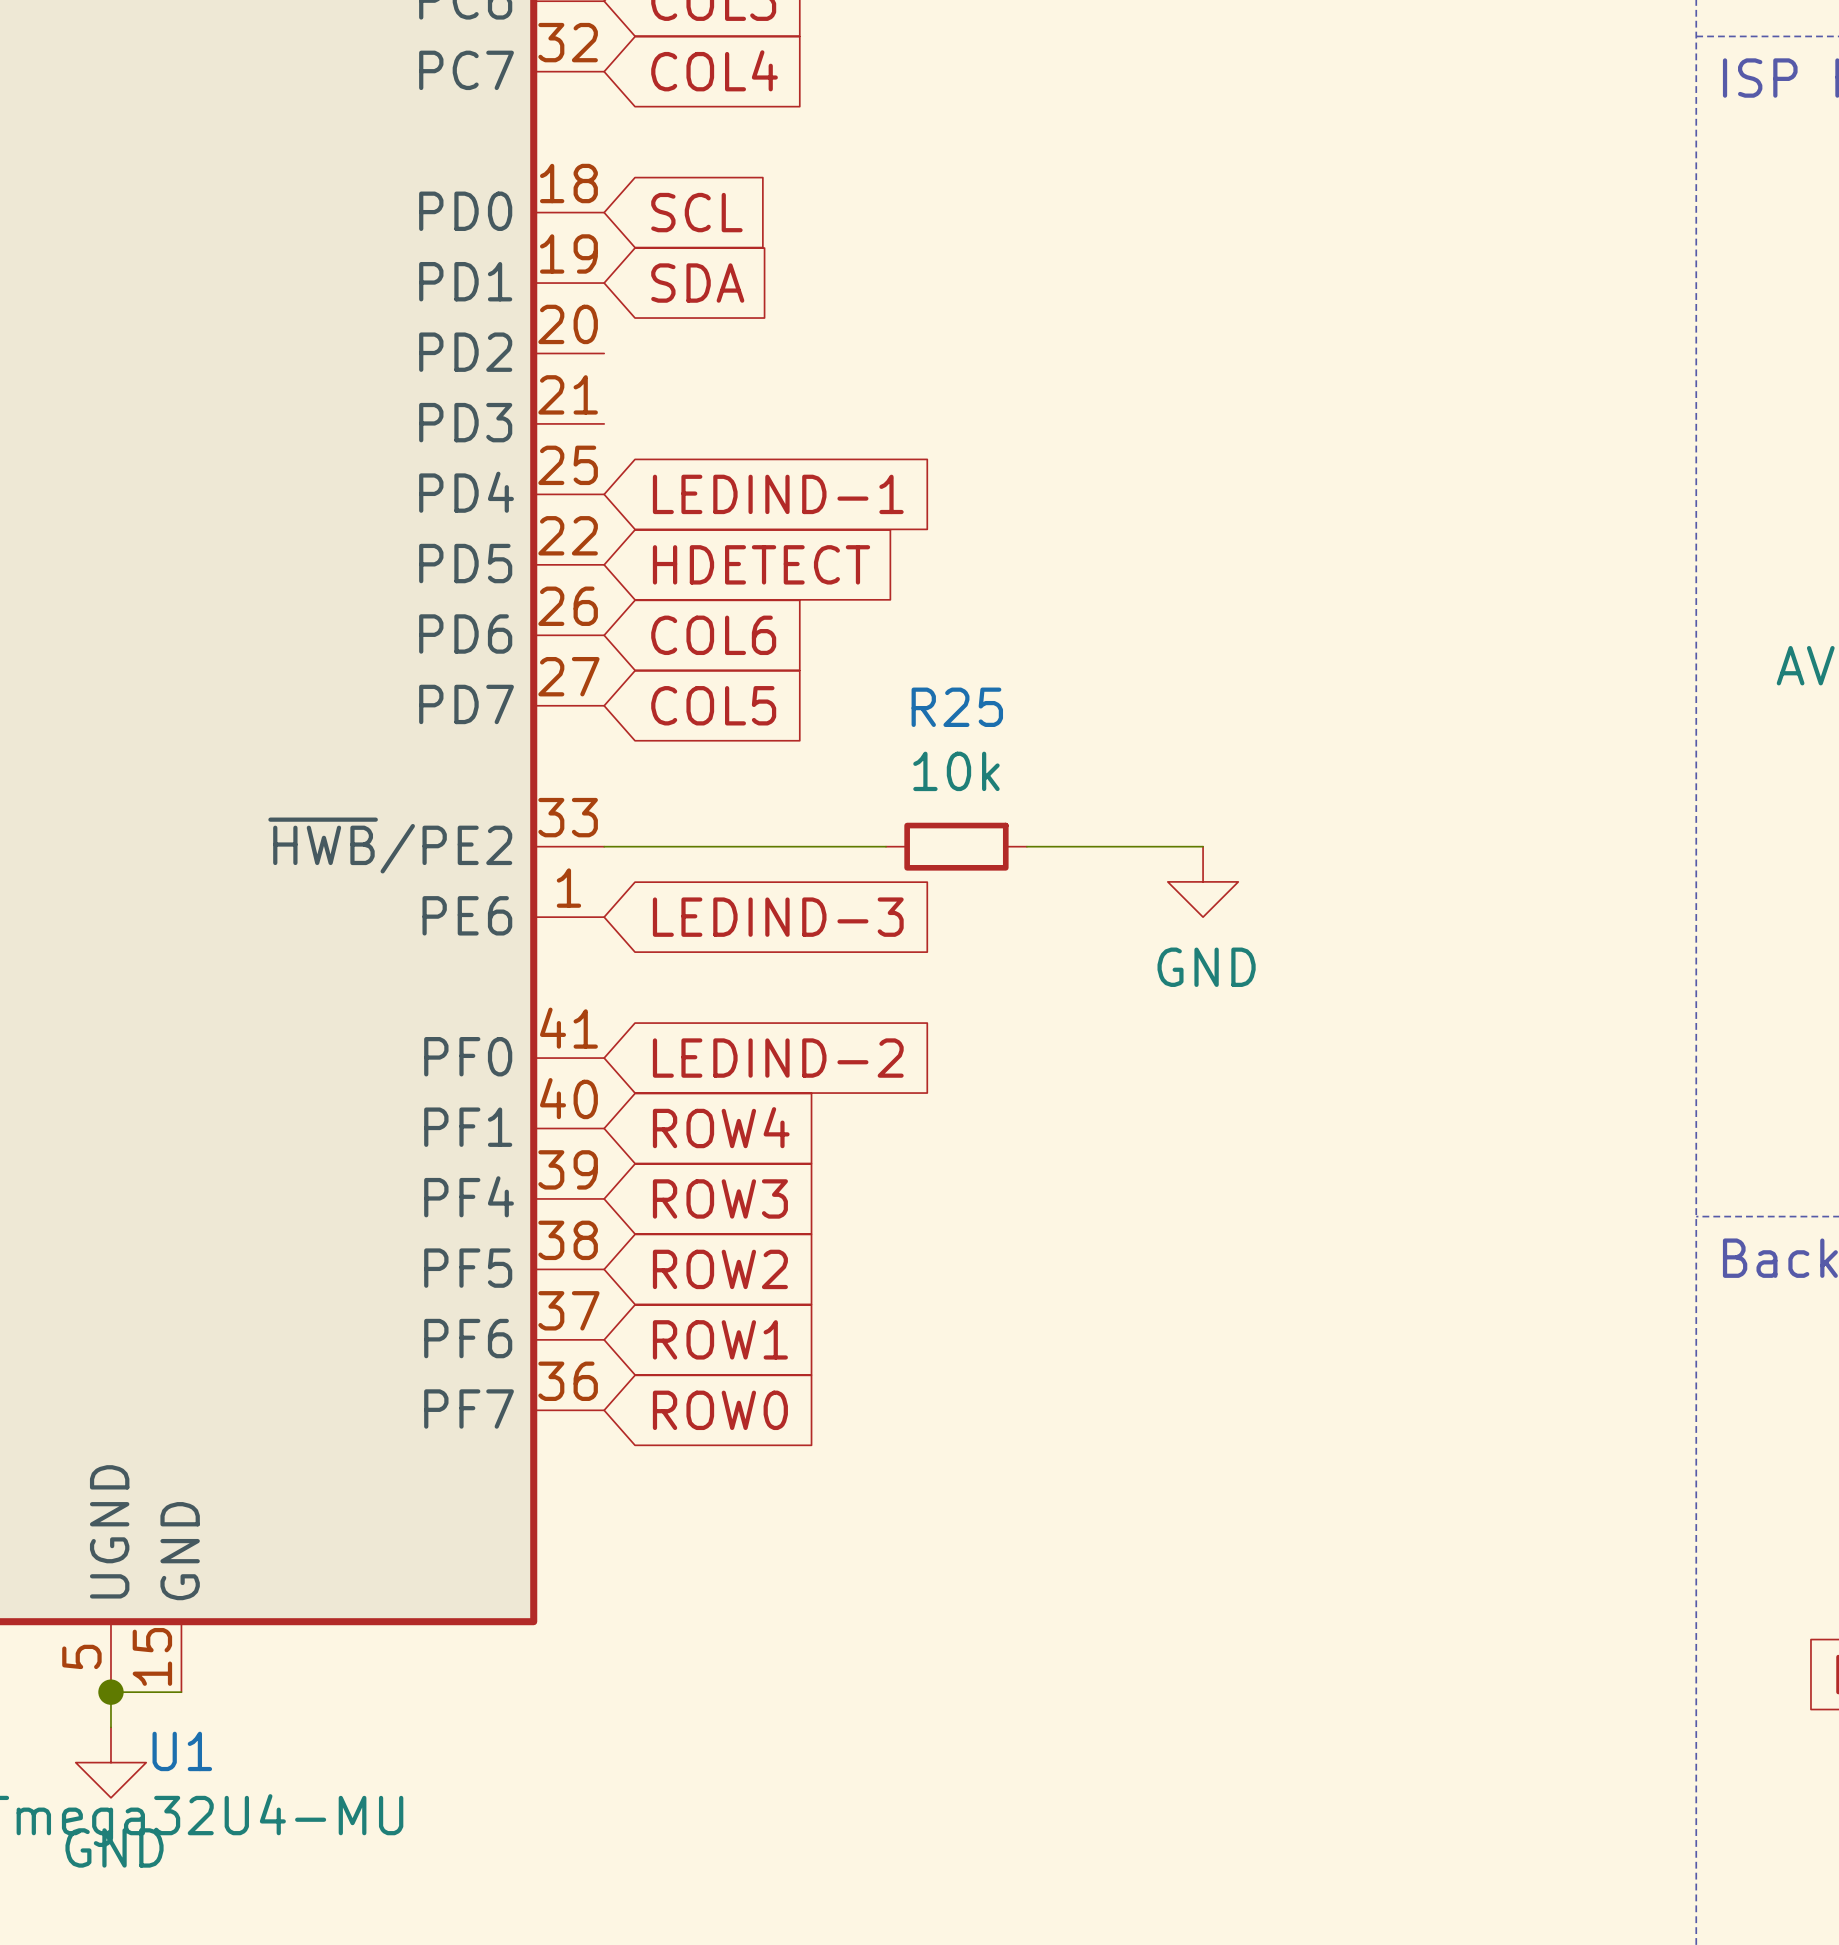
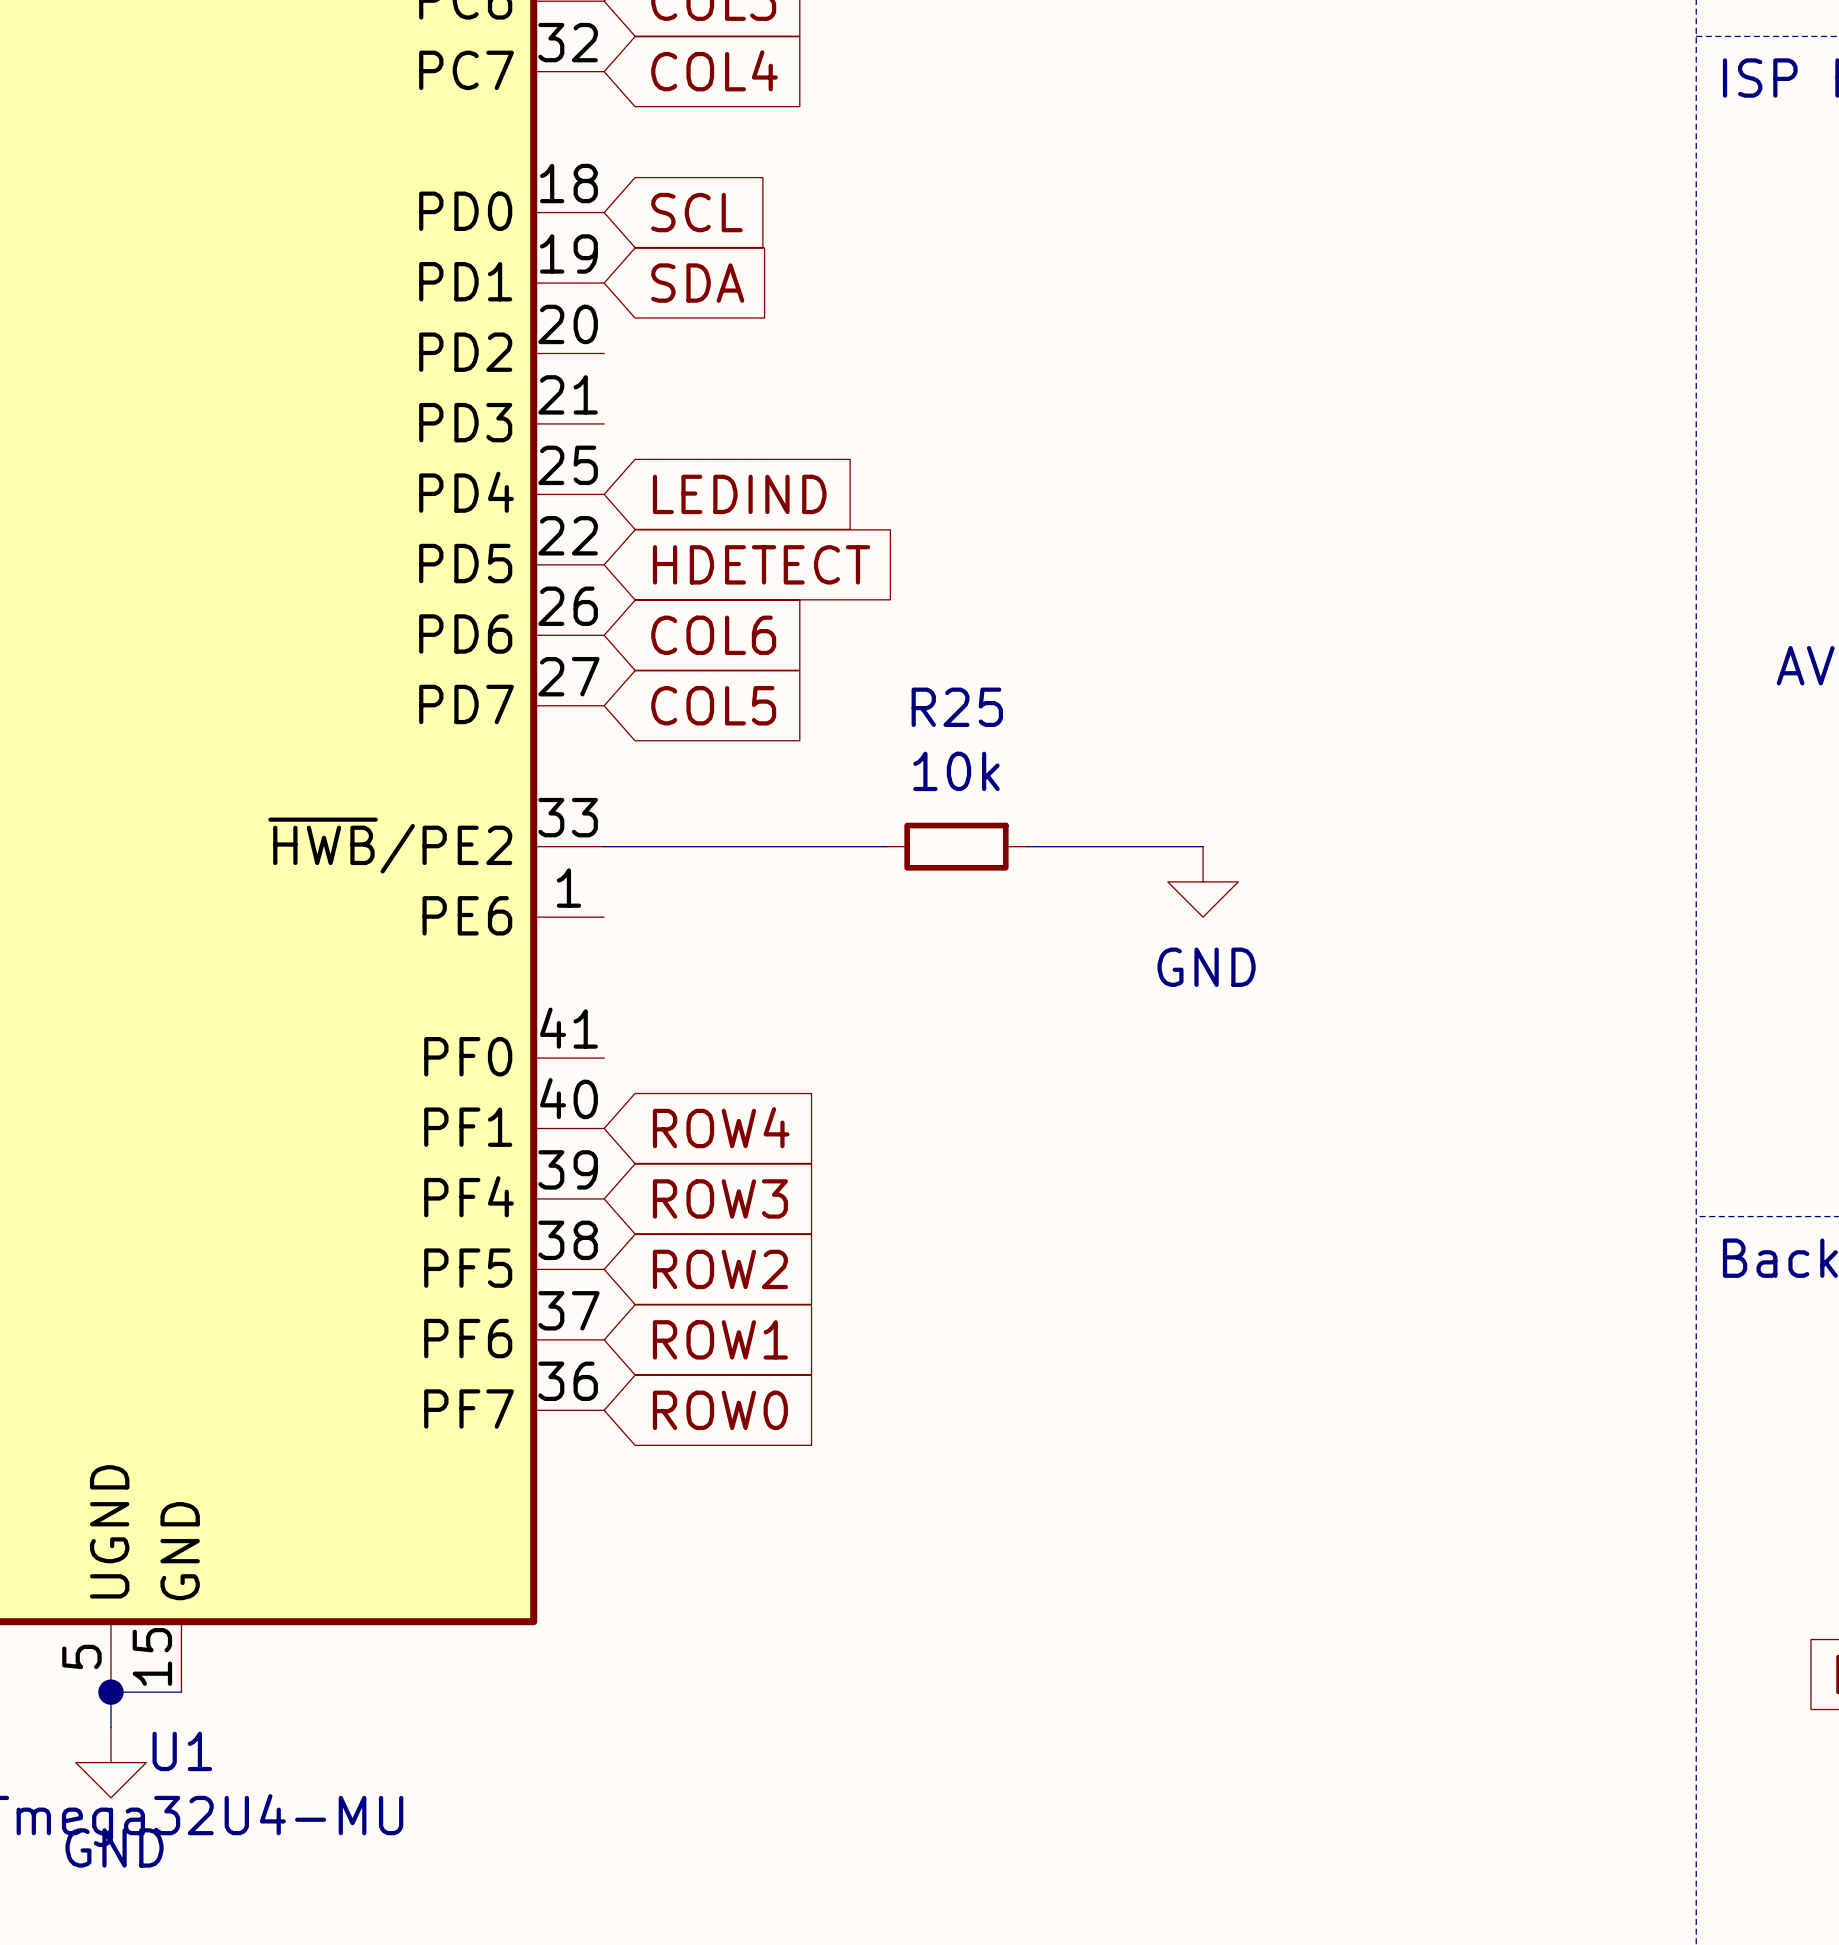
global label: LEDIND-1 (778, 494) -> LEDIND (739, 494)
global label: LEDIND-3 (778, 917) -> none
global label: LEDIND-2 (778, 1058) -> none

